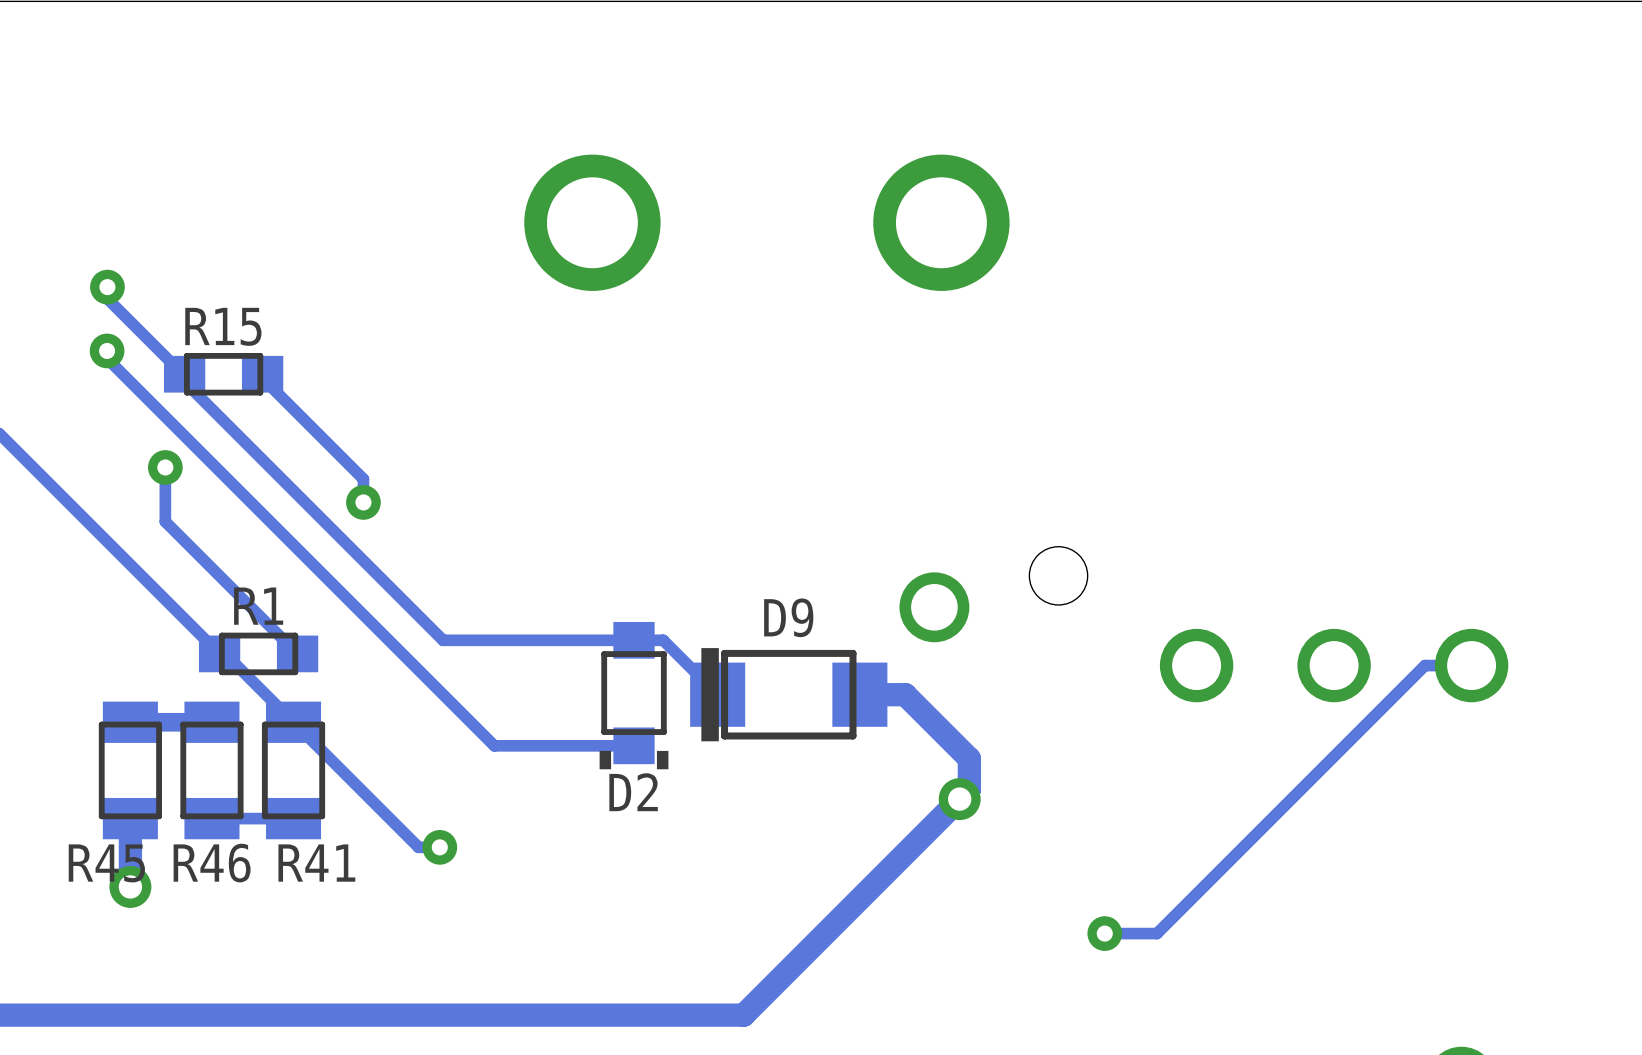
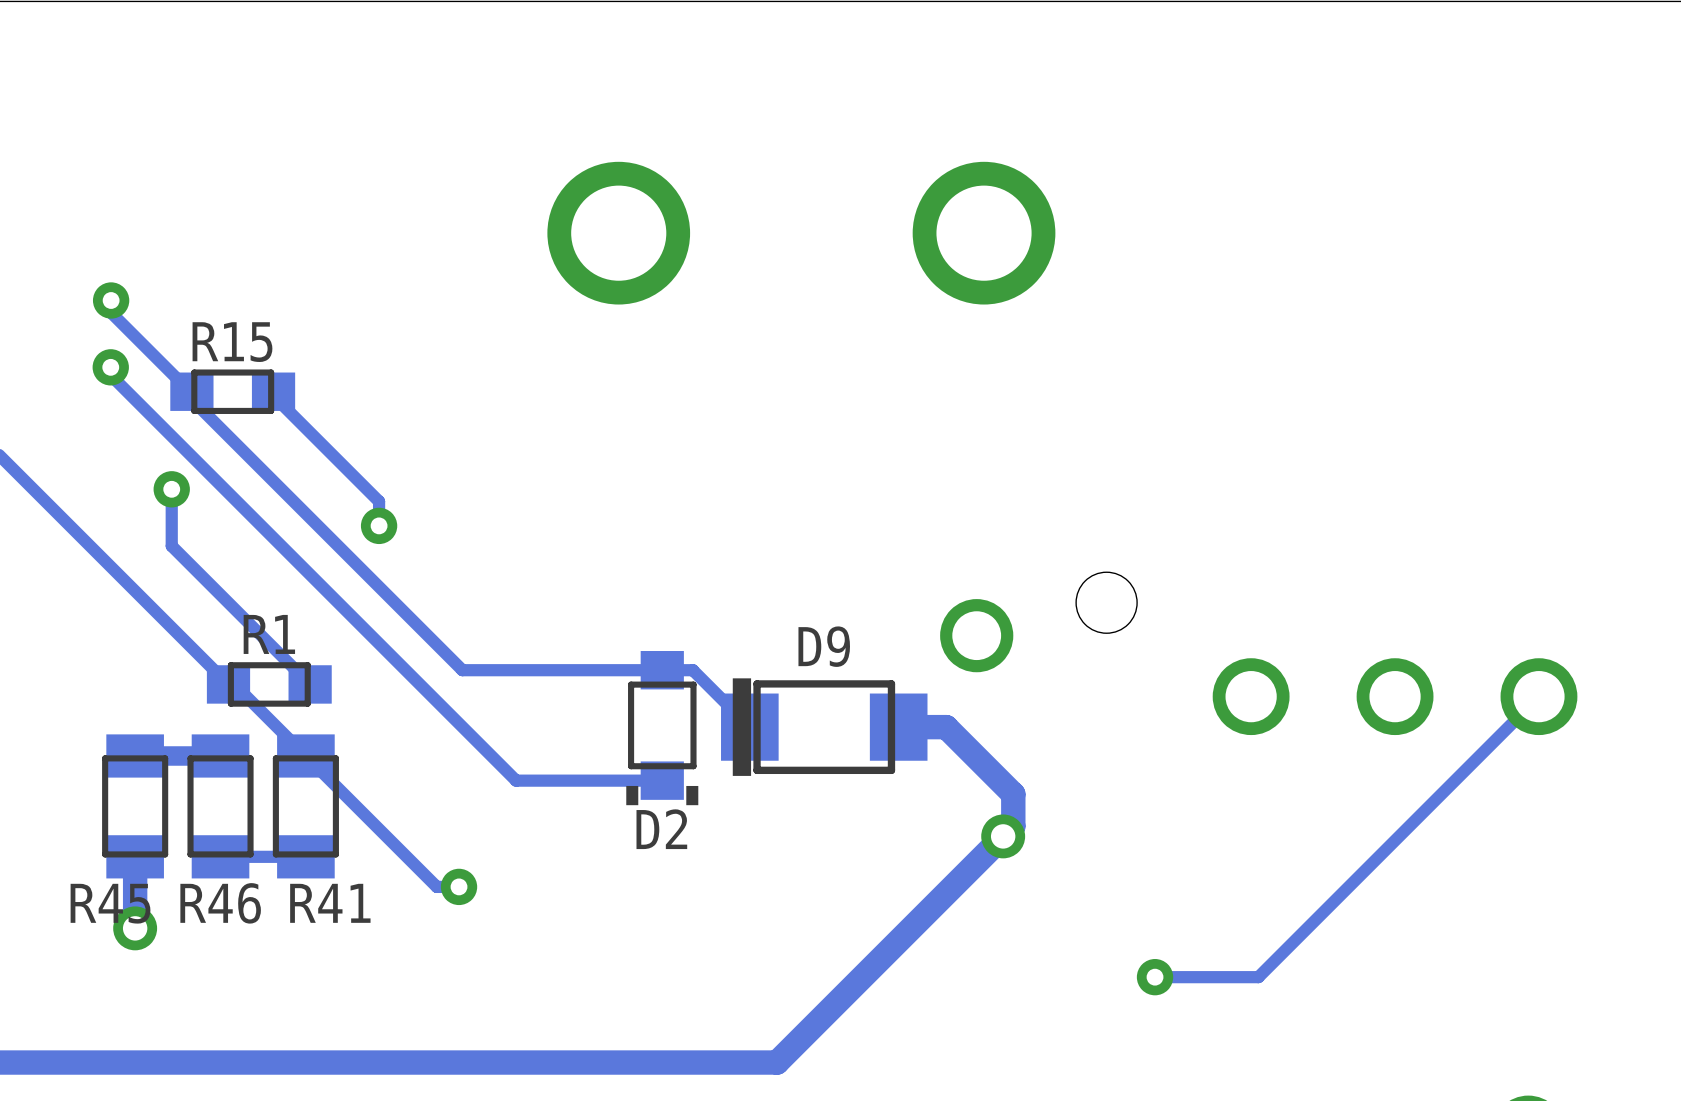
track: (1471, 665) (1424, 665) (1156, 933) -> (1538, 696) (1258, 977) (1209, 977)

